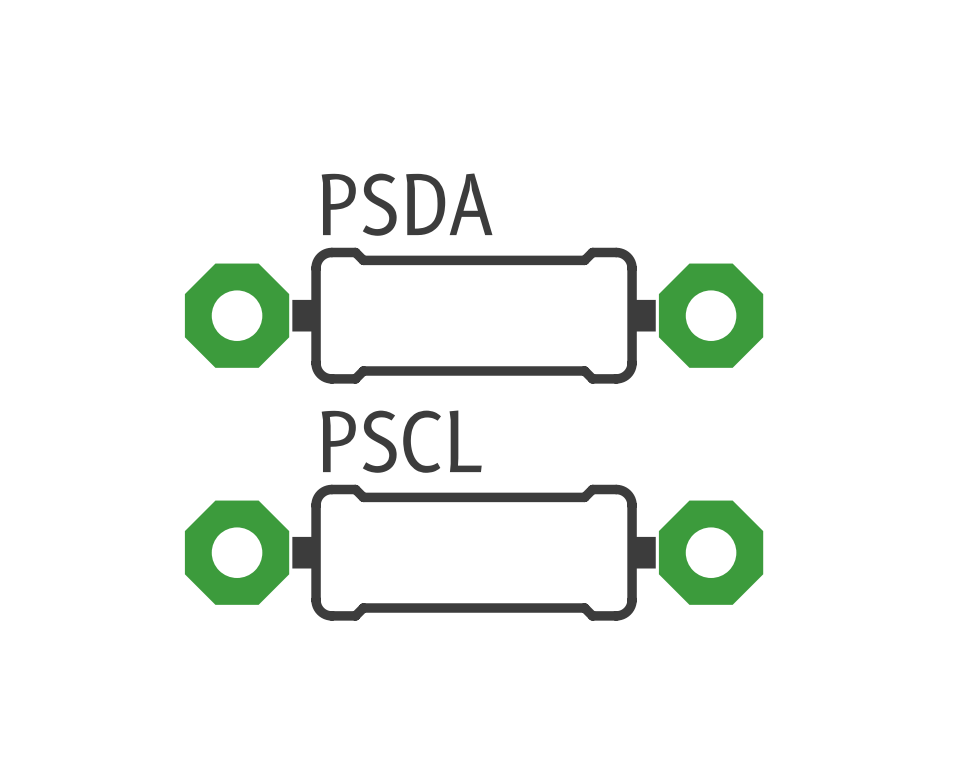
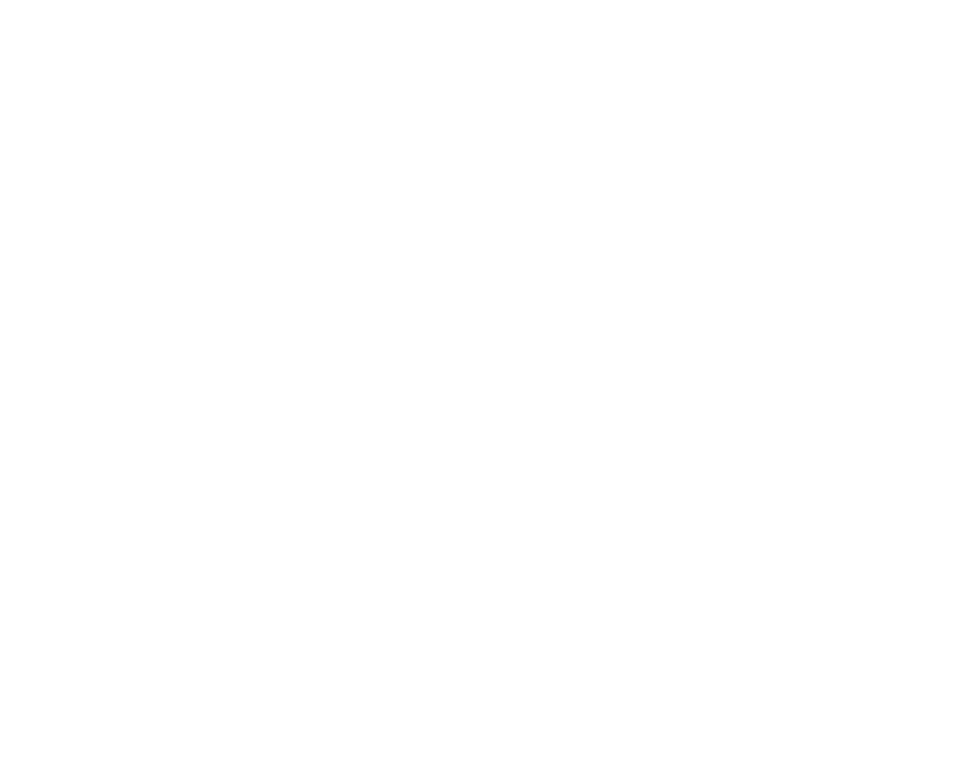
PSDA: (474, 315) -> none
PSCL: (474, 552) -> none

